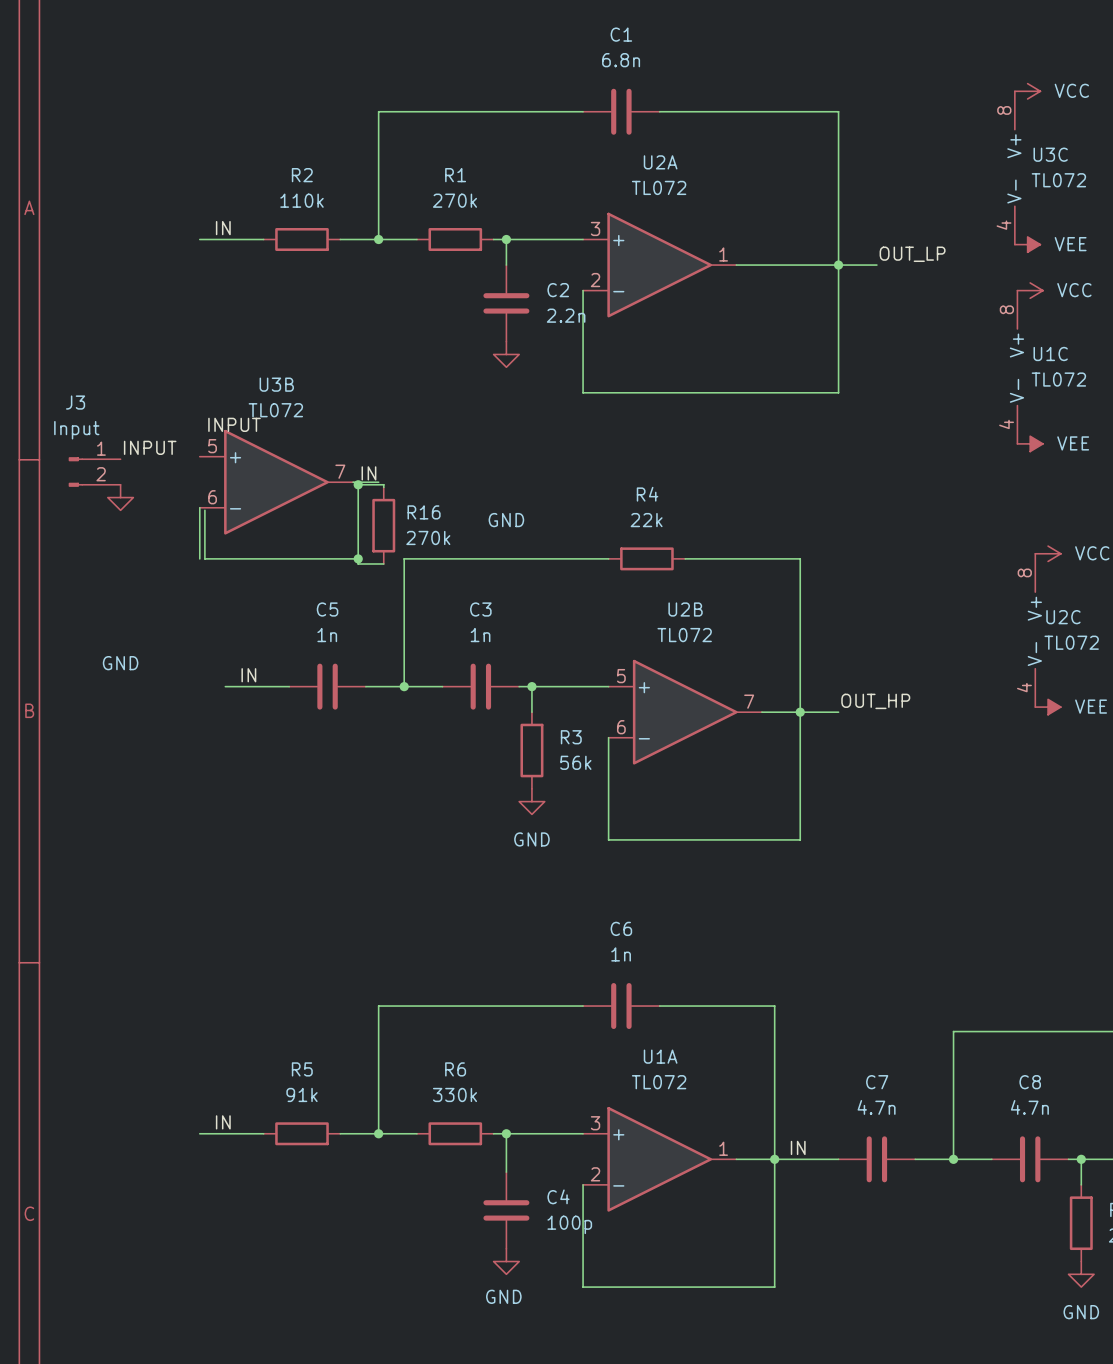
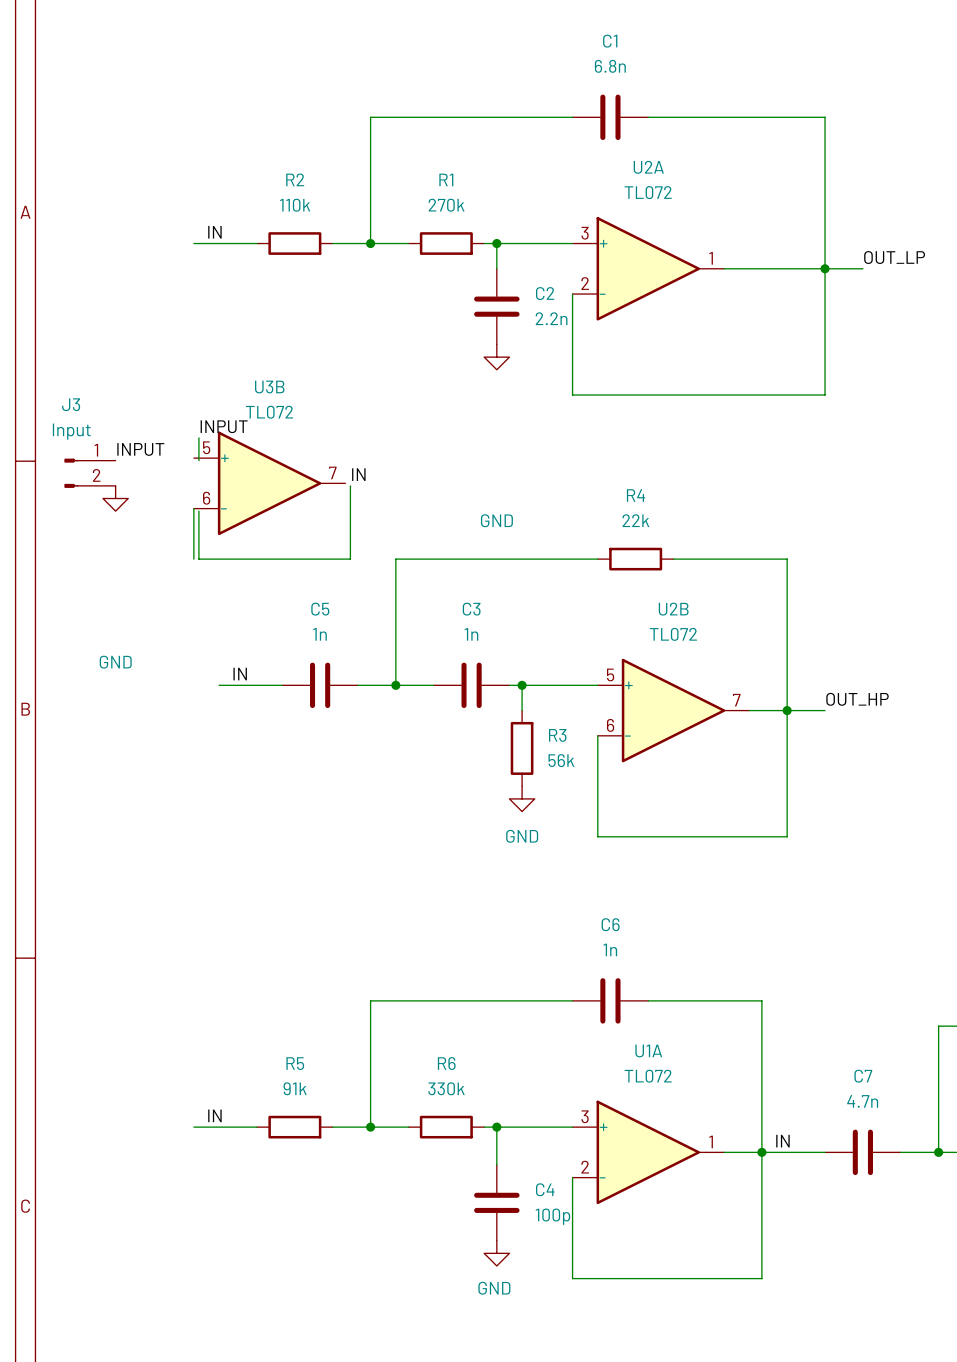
wire: none -> (198, 437) (198, 460)
wire: (353, 482) (378, 482) -> none
wire: (358, 484) (383, 484) (383, 487) -> none
junction: (358, 484) -> none
R16: 270k (383, 525) -> none
wire: (358, 558) (358, 563) (383, 563) -> none
junction: (358, 558) -> none

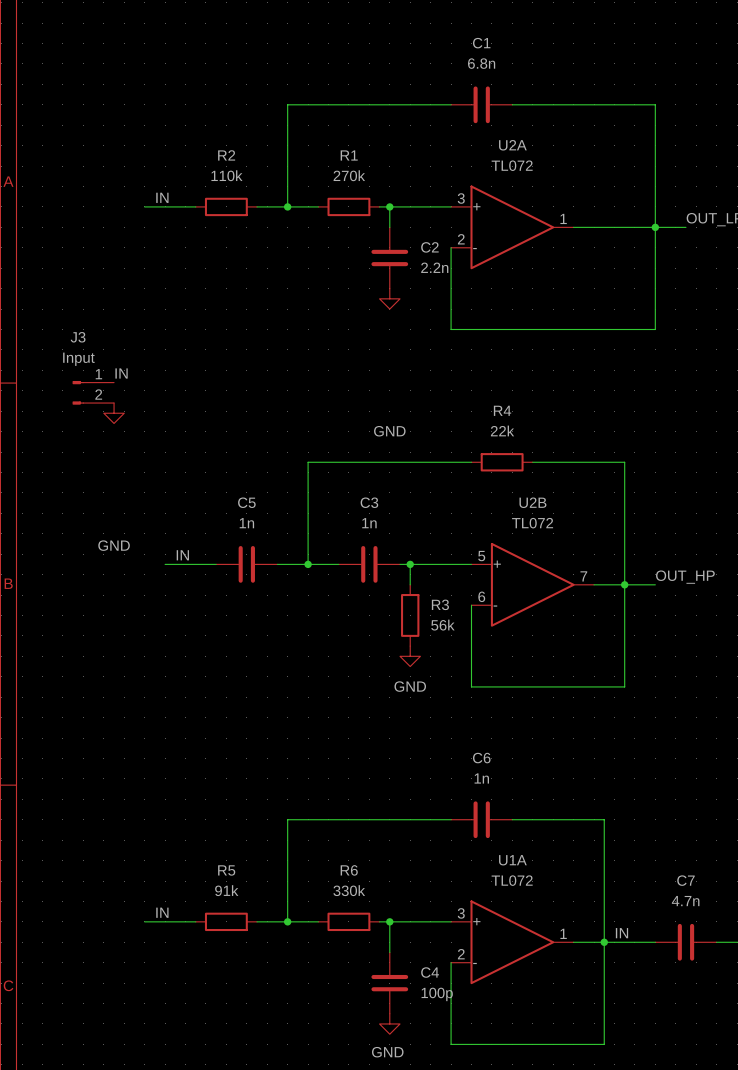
label: INPUT (224, 426) -> none
wire: (198, 437) (198, 460) -> none
label: INPUT (140, 449) -> none
J3 position: (89, 473) -> (93, 392)
label position: IN (358, 474) -> IN (121, 373)
U3B: TL072 (269, 483) -> none
wire: (350, 485) (350, 559) (198, 559) (198, 511) -> none
power symbol position: GND (115, 498) -> GND (114, 413)
wire: (193, 508) (193, 559) -> none

